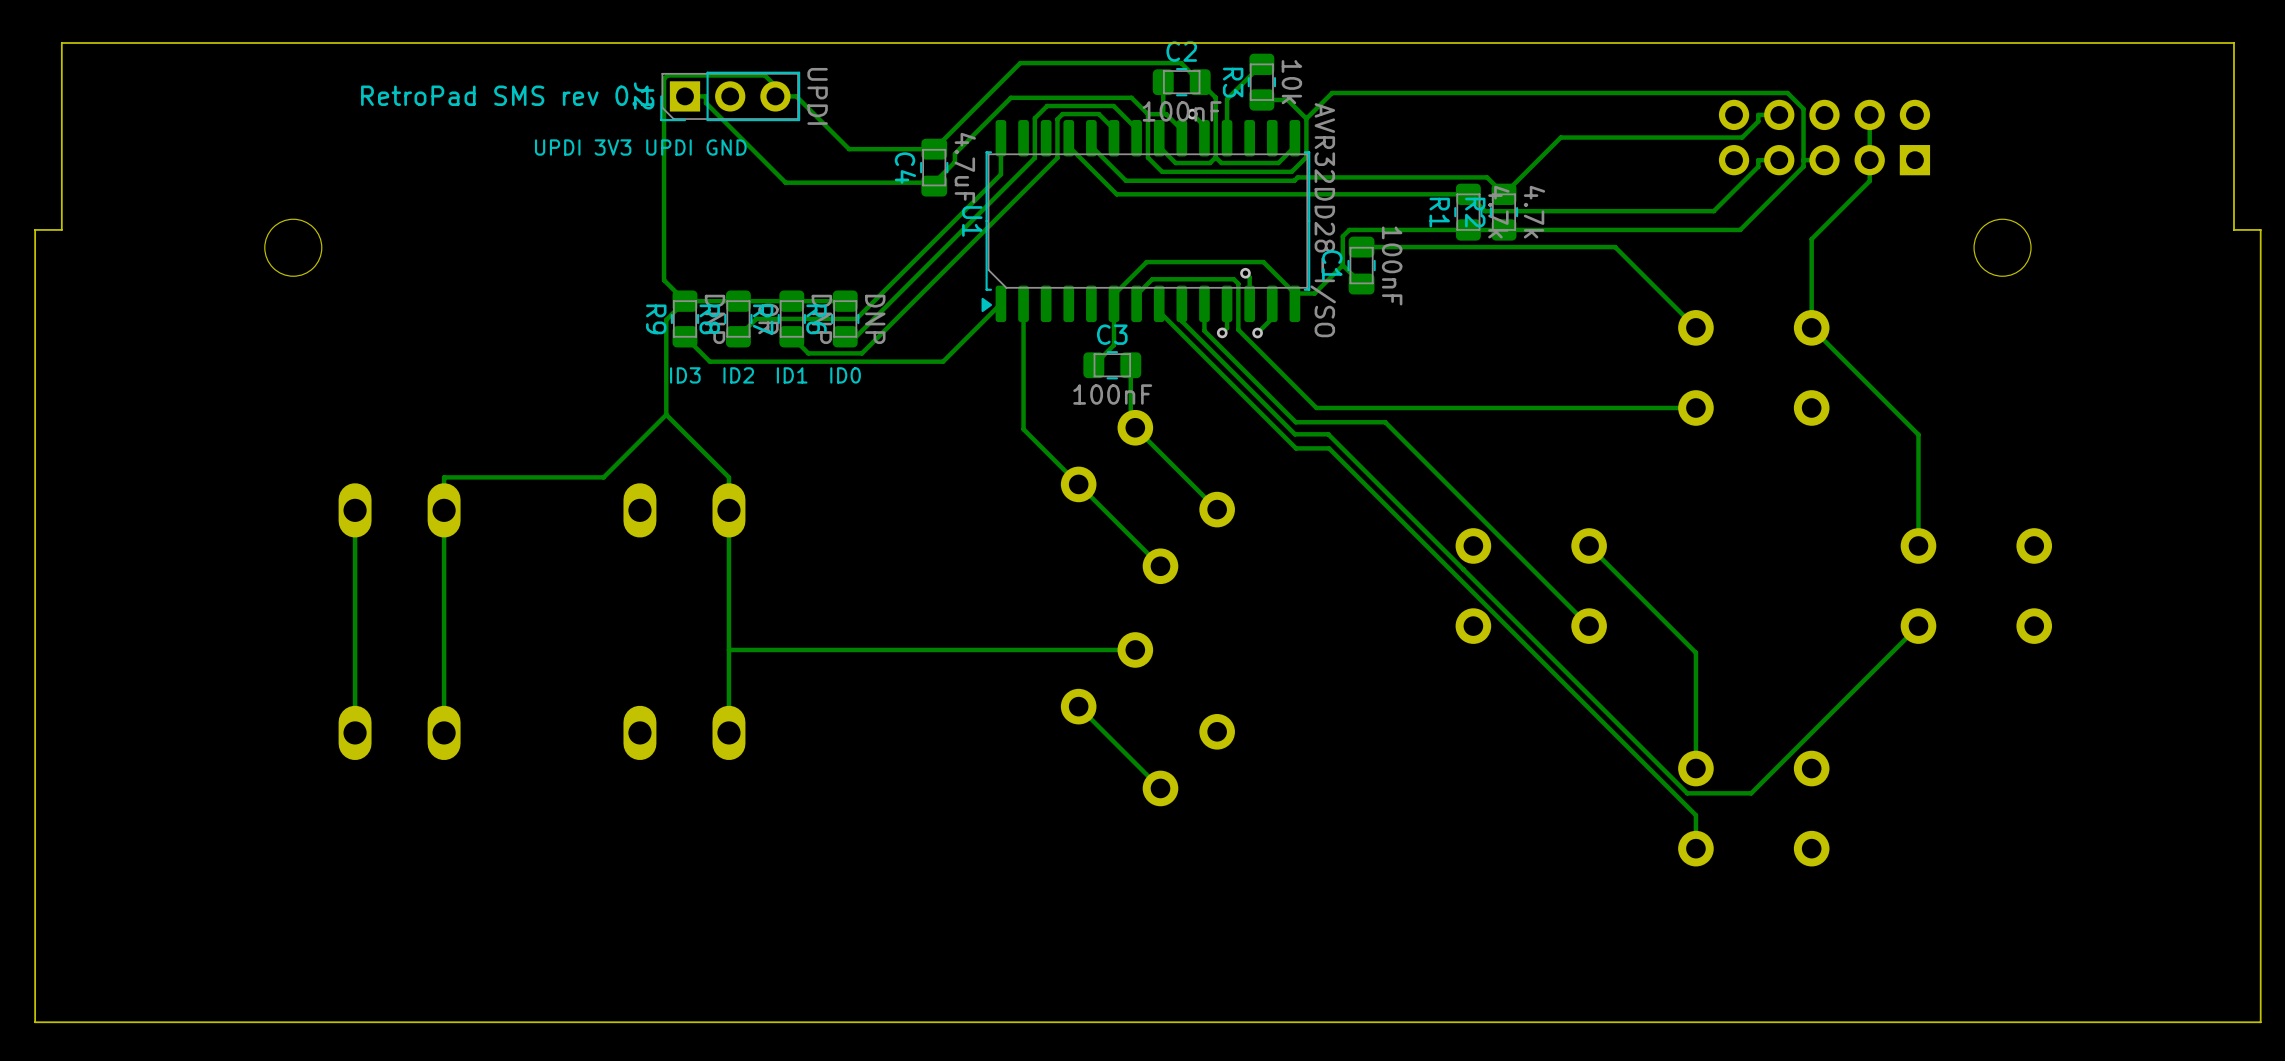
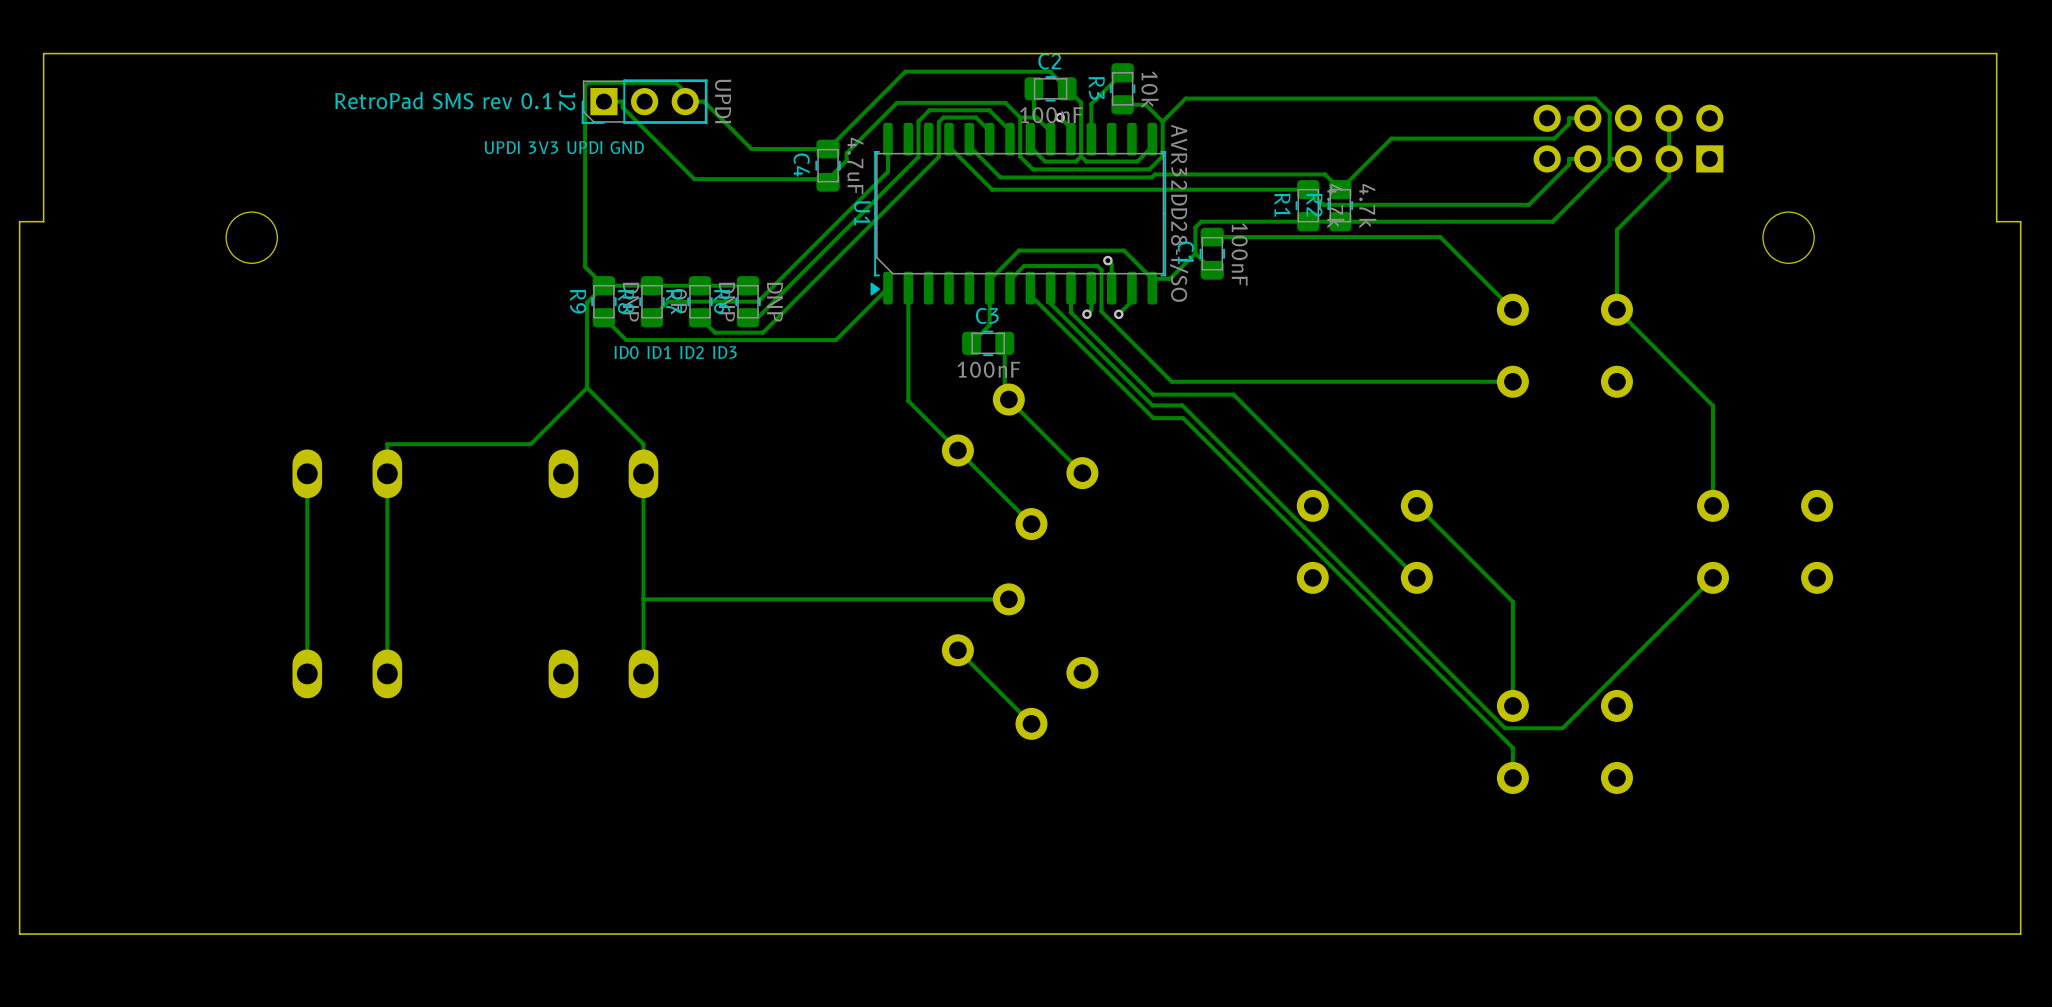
text: ID3 (685, 375) -> none
text: ID2 (738, 375) -> none
text: none -> ID0 ID1 ID2 ID3 (675, 352)
text: ID1 (792, 375) -> none
text: ID0 (845, 375) -> none

